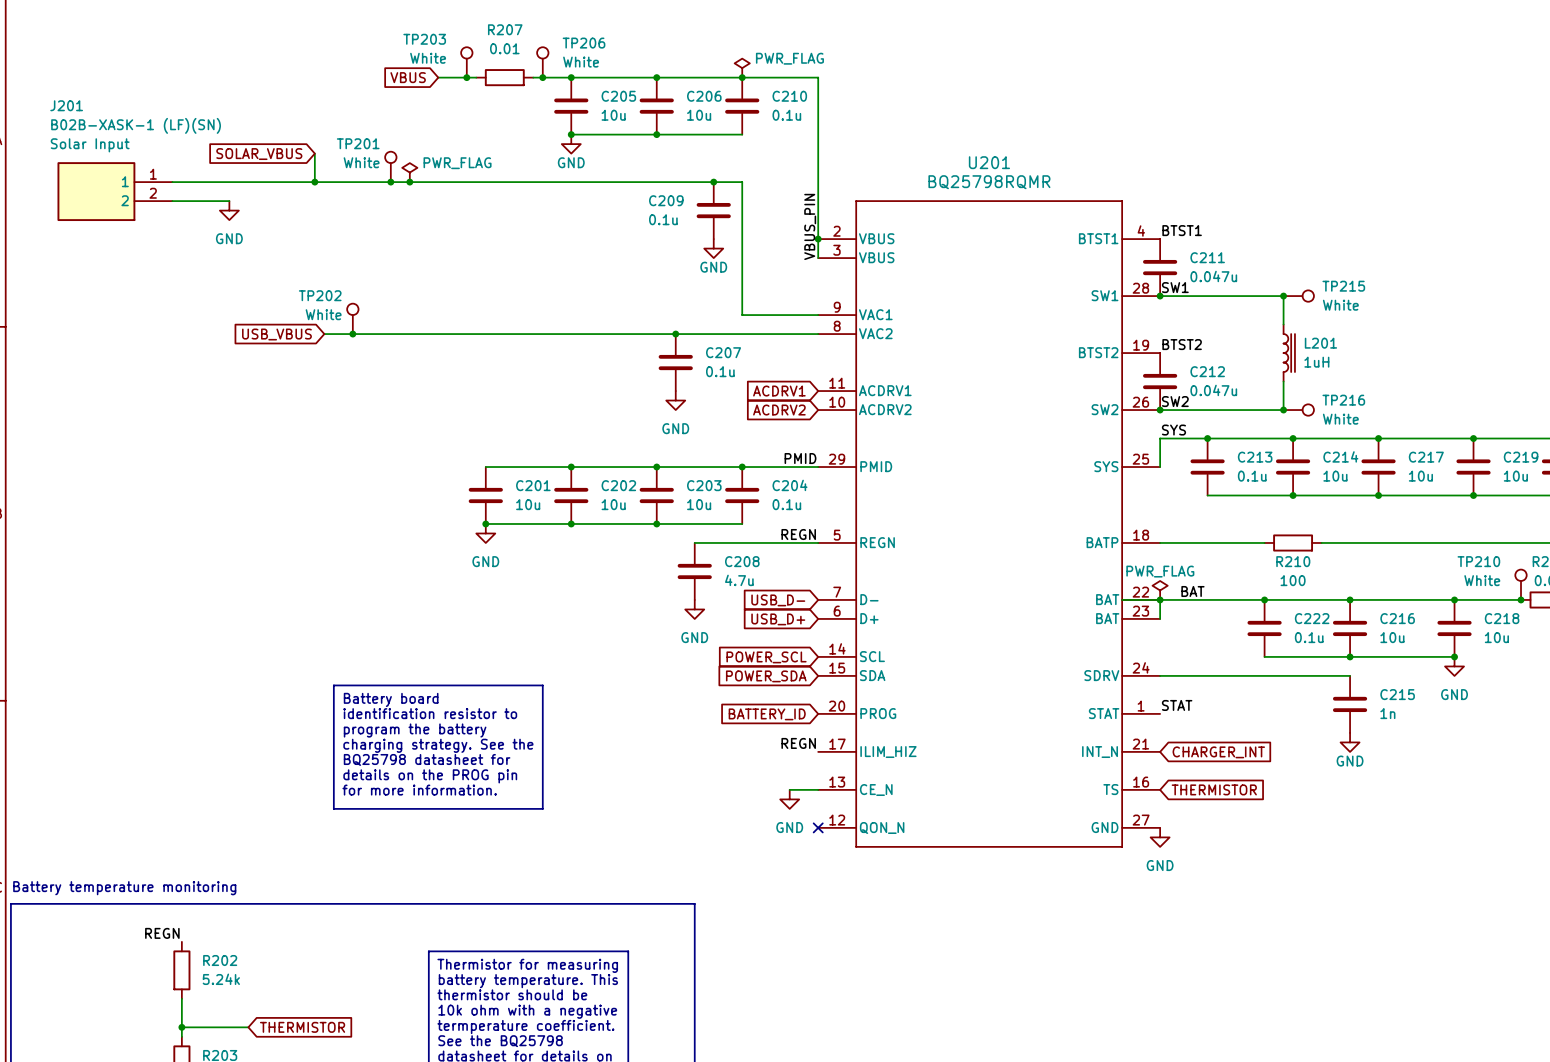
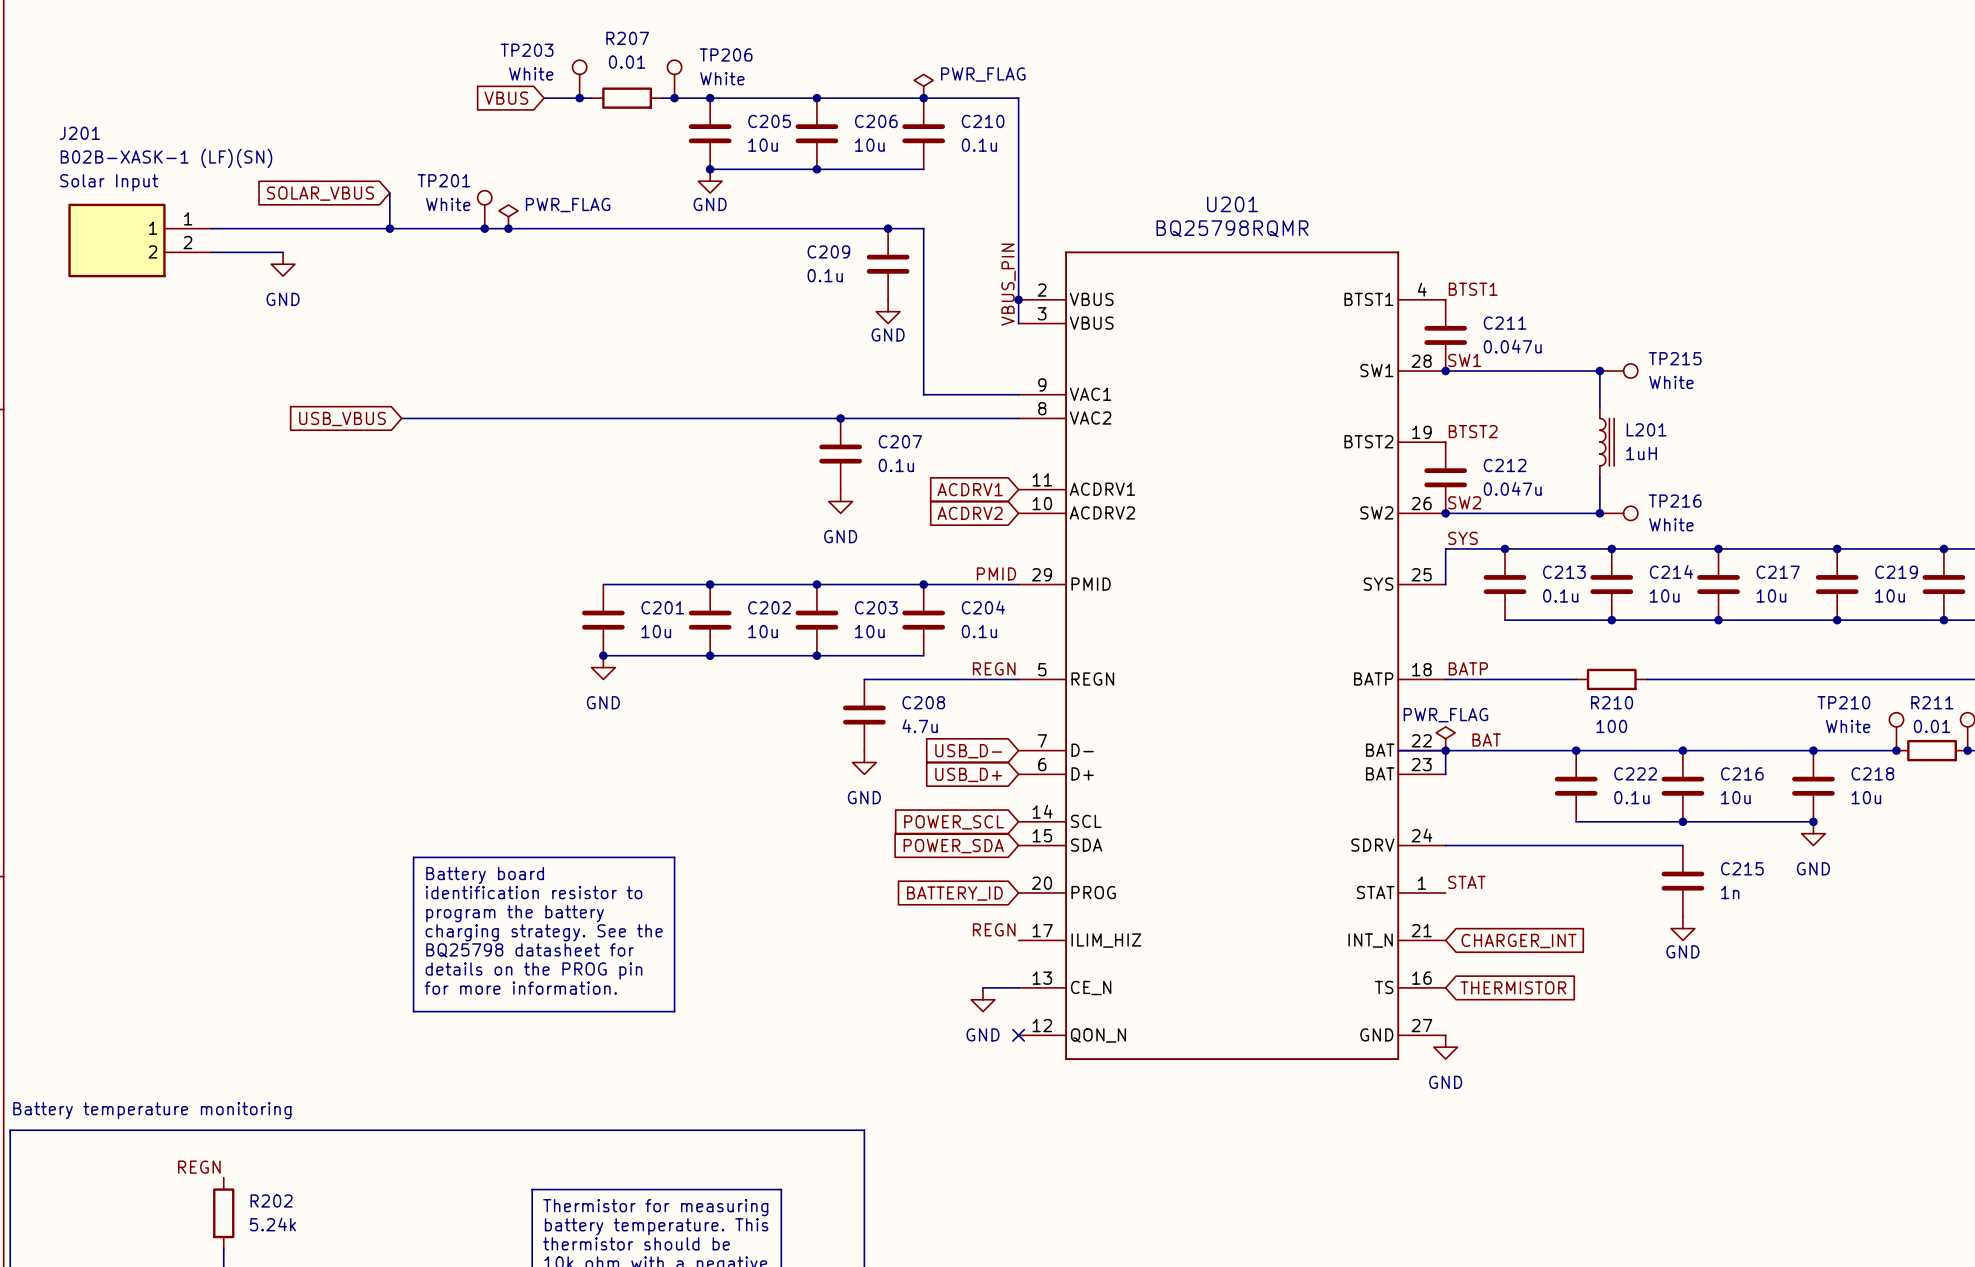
TP202: White (352, 318) -> none
junction: (352, 334) -> none
label: none -> BATP (1468, 668)

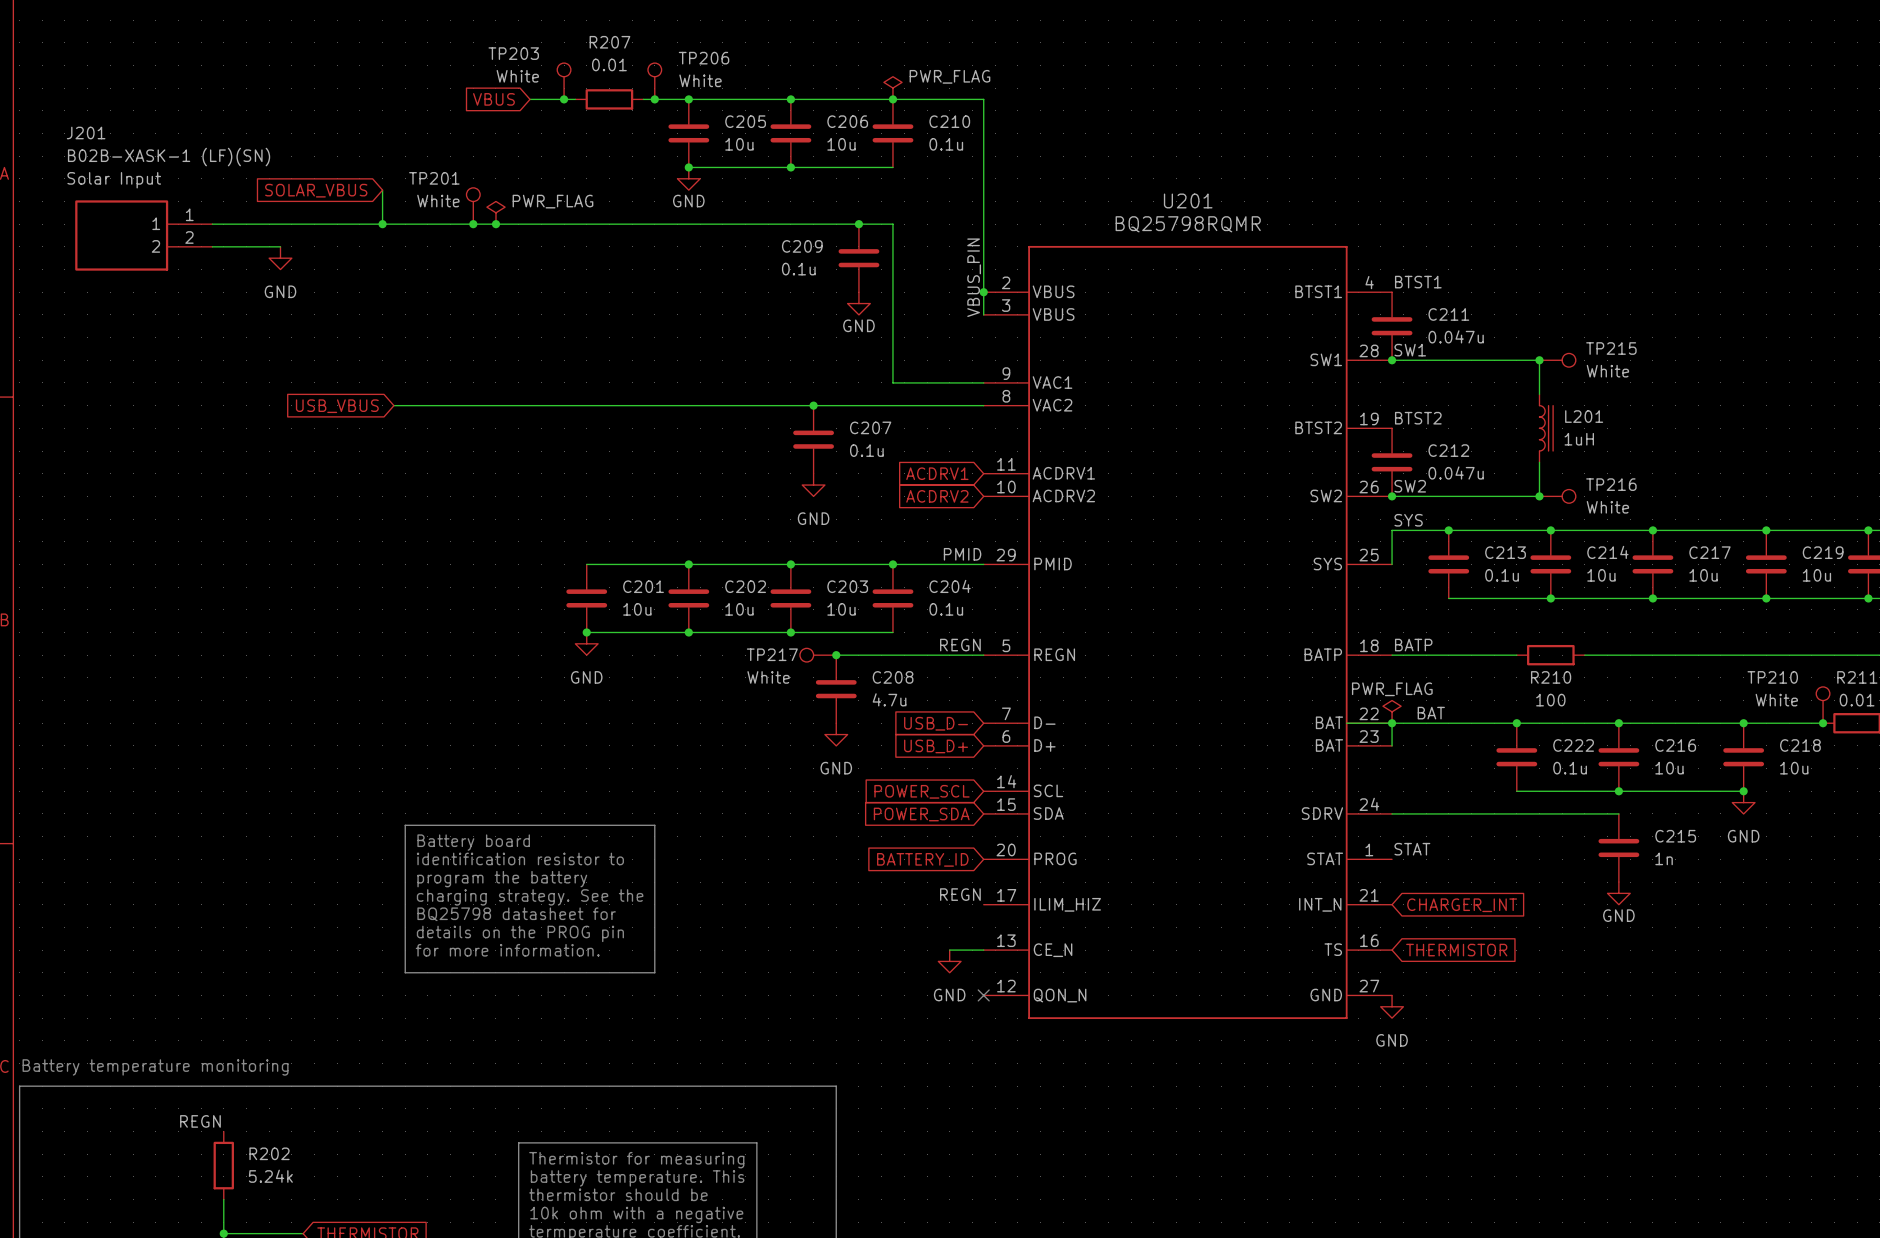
TP217: none -> White (818, 655)
junction: none -> (836, 655)

